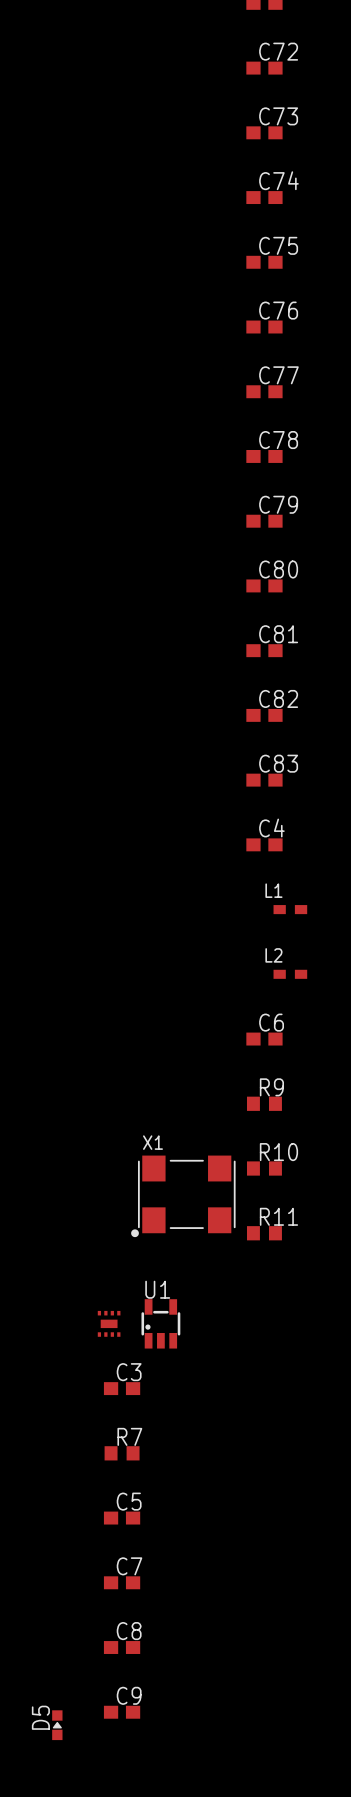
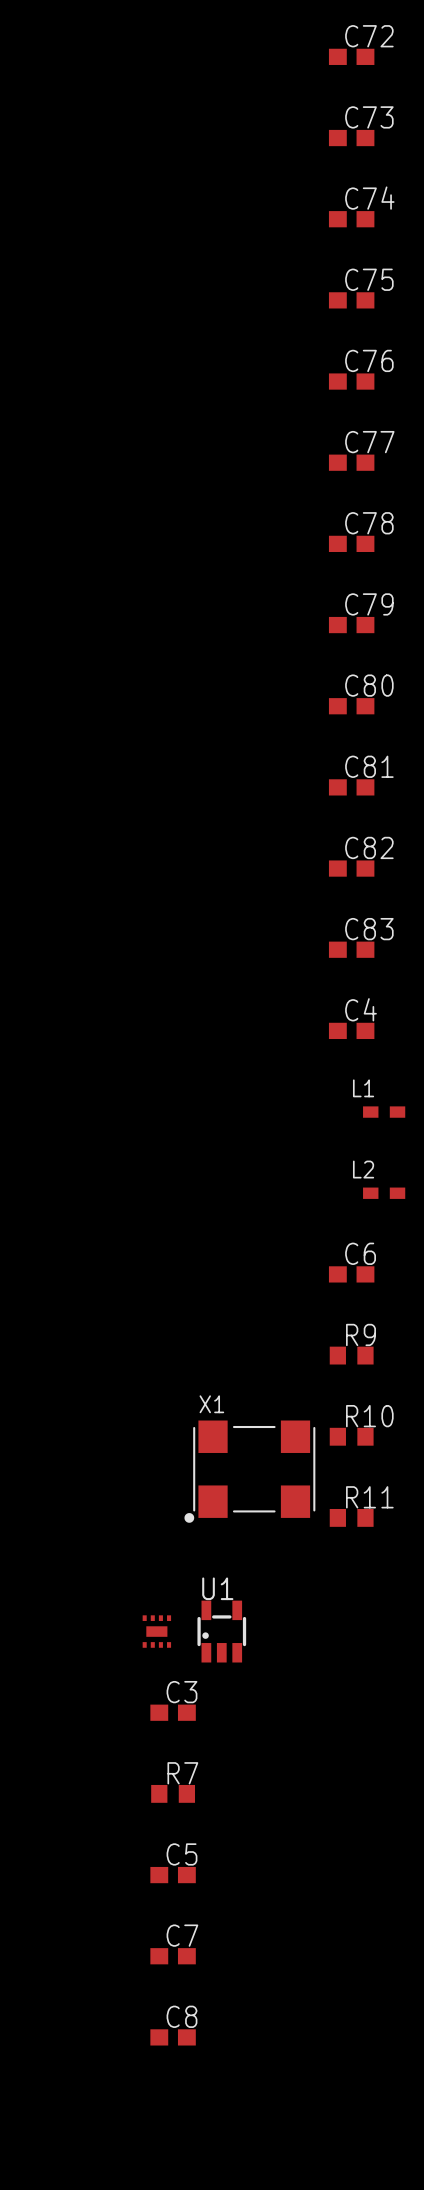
C9: (122, 1712) -> none
D5: (57, 1725) -> none

